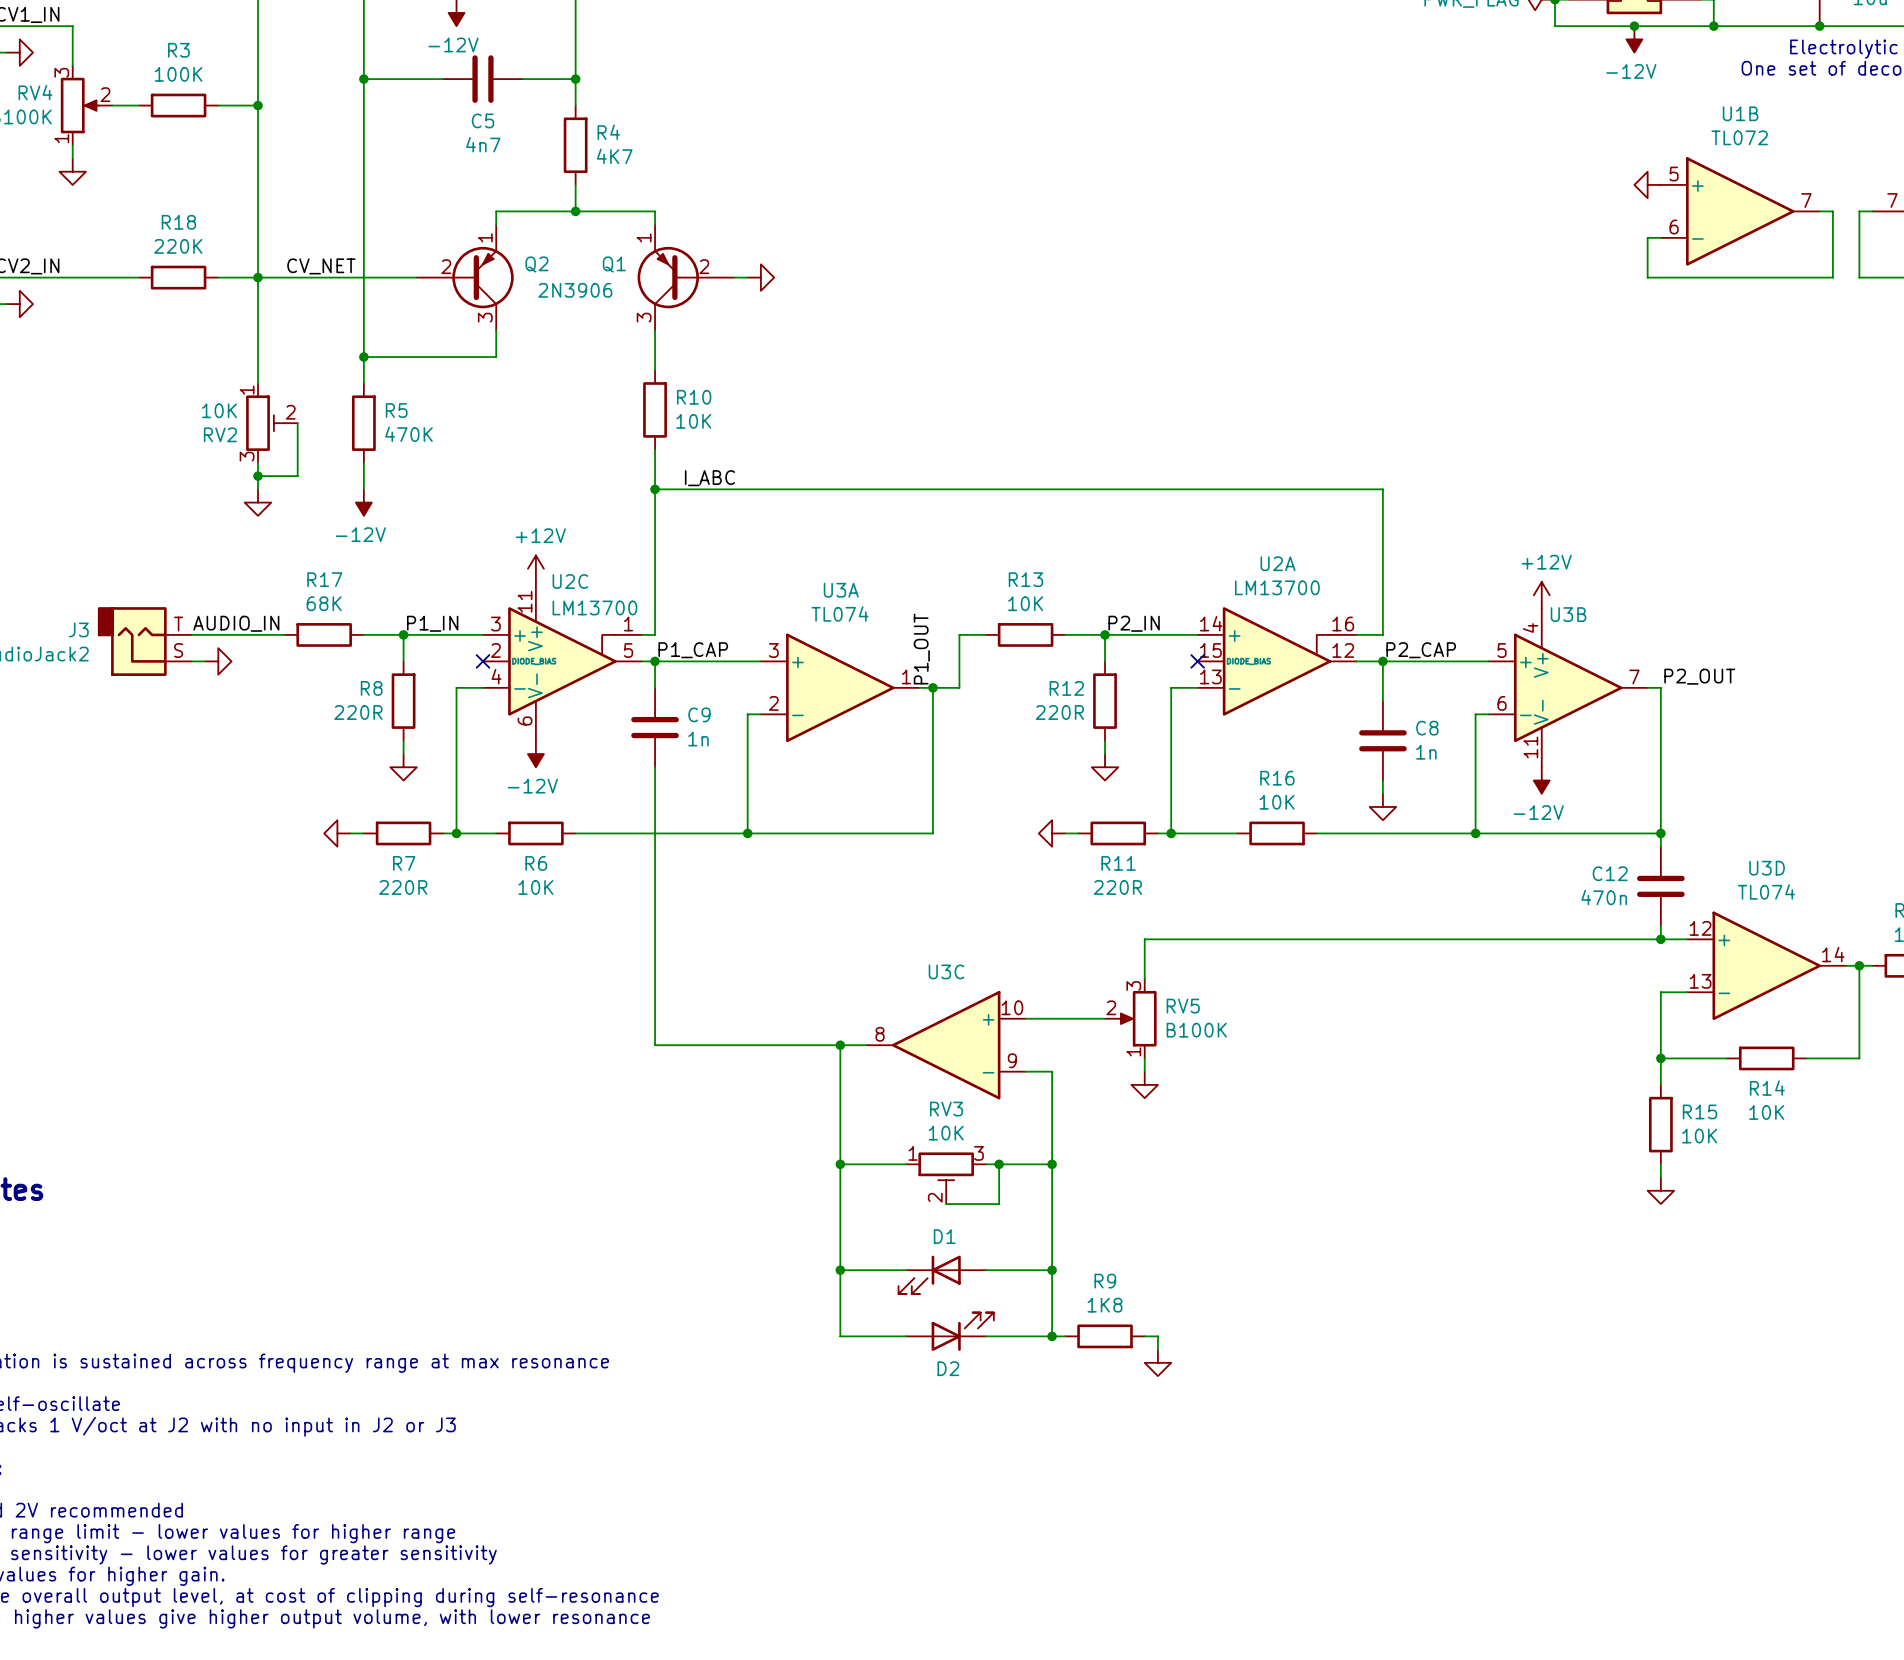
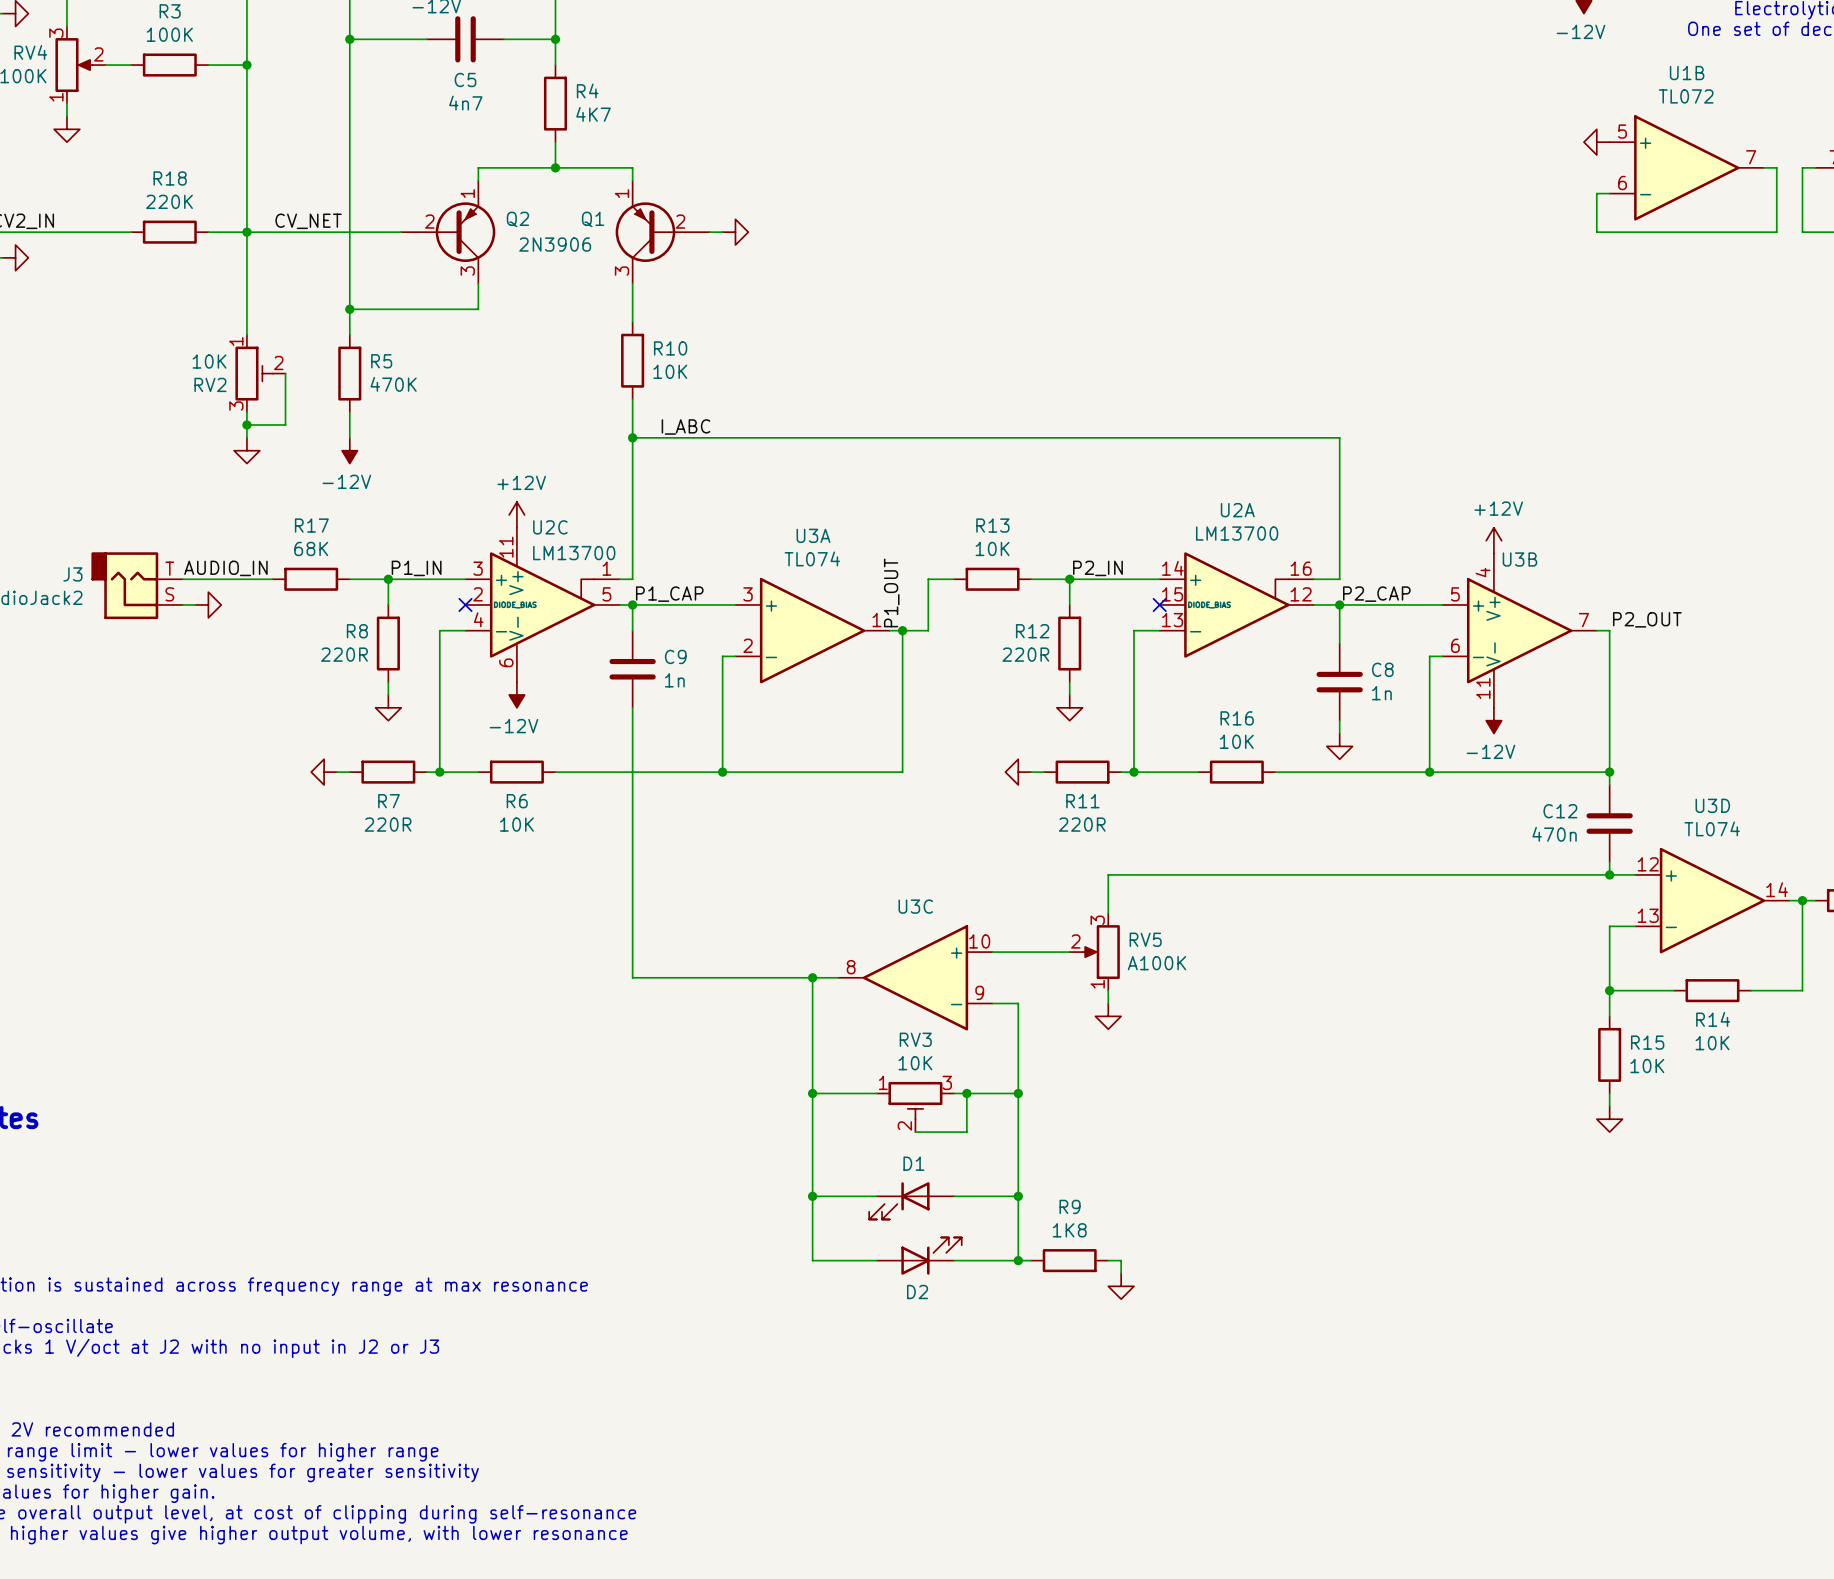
RV5 value: B100K (1196, 1030) -> A100K (1156, 963)

